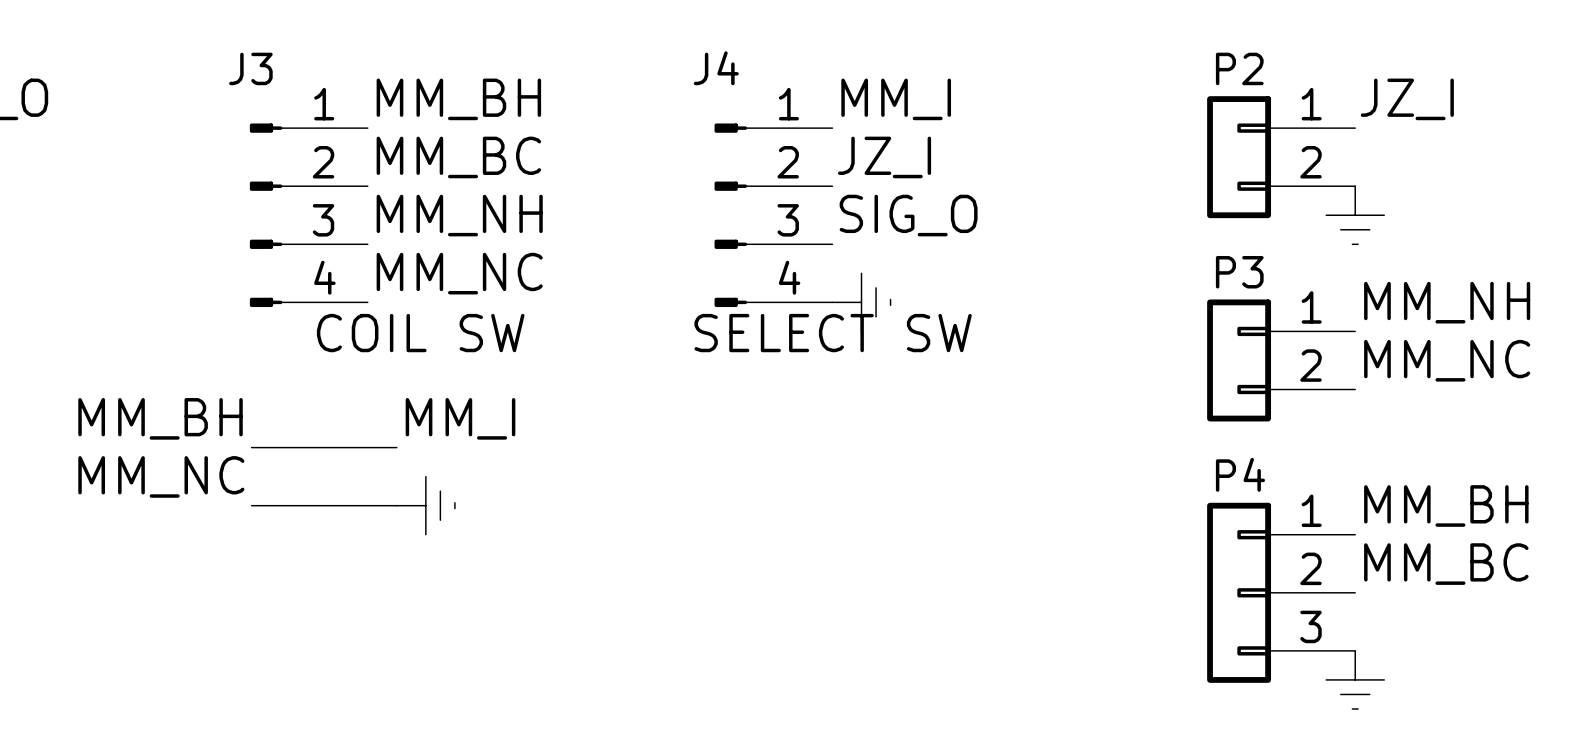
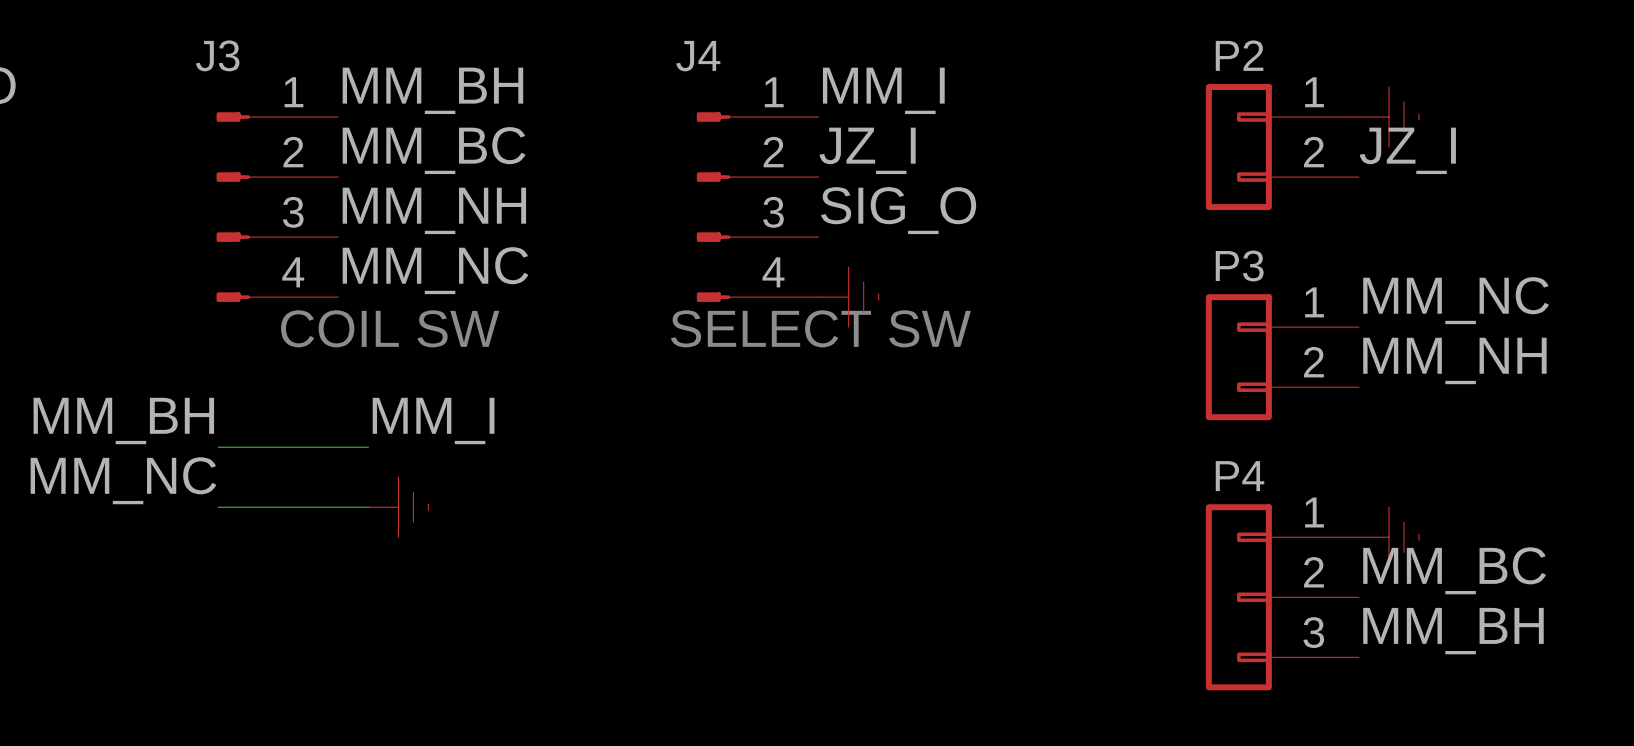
label position: JZ_I (1407, 99) -> JZ_I (1407, 150)
power symbol rotation: 0° (1355, 215) -> 90° counterclockwise (1388, 117)
power symbol position: (1355, 215) -> (1388, 117)
label: MM_NH (1447, 302) -> MM_NC (1456, 300)
label: MM_NC (1447, 360) -> MM_NH (1454, 360)
label position: MM_BH (1446, 505) -> MM_BH (1453, 631)
power symbol rotation: 0° (1355, 679) -> 90° counterclockwise (1388, 537)
power symbol position: (1355, 679) -> (1388, 537)

